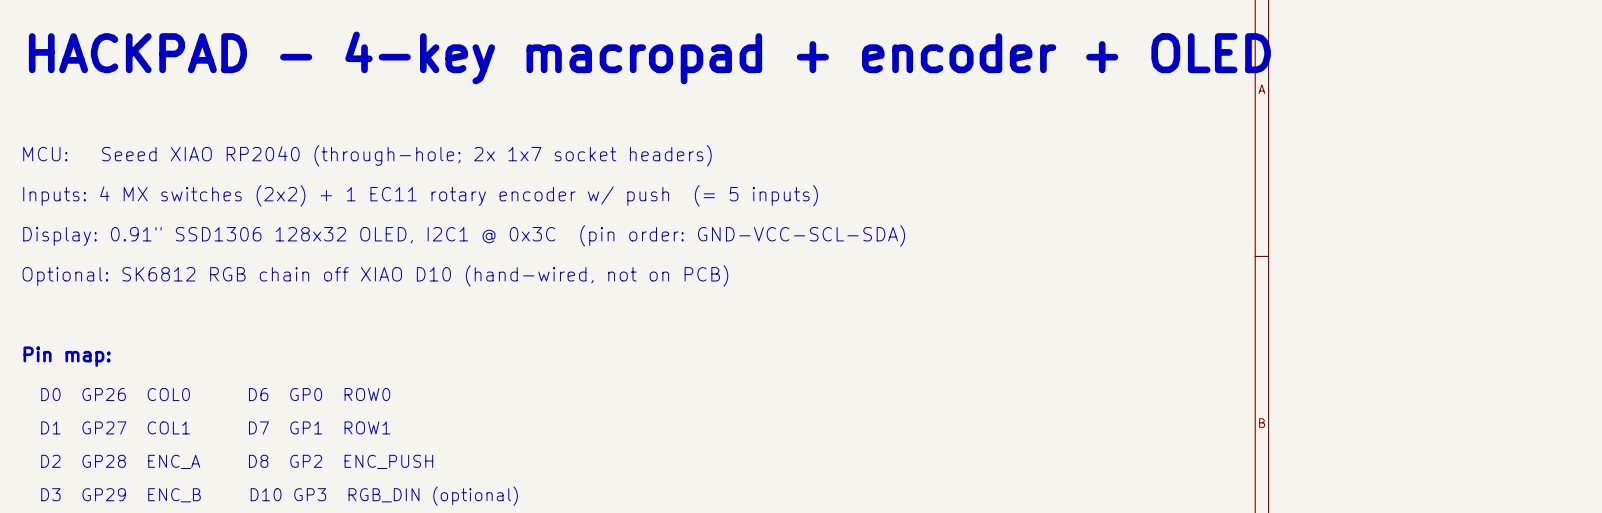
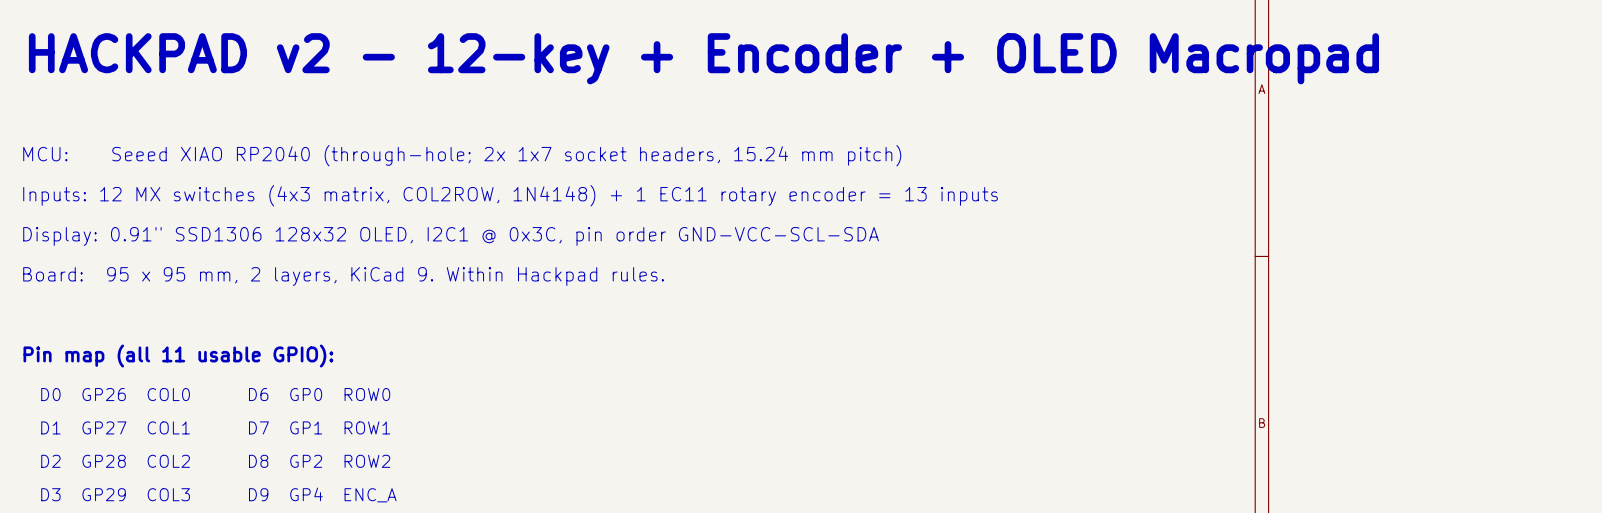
text: HACKPAD - 4-key macropad + encoder + OLED (649, 57) -> HACKPAD v2 - 12-key + Encoder + OLED Macropad (703, 58)
text: MCU: Seeed XIAO RP2040 (through-hole; 2x 1x7 socket headers) (367, 155) -> MCU: Seeed XIAO RP2040 (through-hole; 2x 1x7 socket headers, 15.24 mm pitch) (462, 155)
text: Inputs: 4 MX switches (2x2) + 1 EC11 rotary encoder w/ push (= 5 inputs) (420, 195) -> Inputs: 12 MX switches (4x3 matrix, COL2ROW, 1N4148) + 1 EC11 rotary encoder = 13 inputs (510, 195)
text: Display: 0.91" SSD1306 128x32 OLED, I2C1 @ 0x3C (pin order: GND-VCC-SCL-SDA) (464, 235) -> Display: 0.91" SSD1306 128x32 OLED, I2C1 @ 0x3C, pin order GND-VCC-SCL-SDA (451, 236)
text: Optional: SK6812 RGB chain off XIAO D10 (hand-wired, not on PCB) (375, 275) -> Board: 95 x 95 mm, 2 layers, KiCad 9. Within Hackpad rules. (343, 276)
text: Pin map: (67, 356) -> Pin map (all 11 usable GPIO): (178, 356)
text: D2 GP28 ENC_A D8 GP2 ENC_PUSH (237, 461) -> D2 GP28 COL2 D8 GP2 ROW2 (215, 461)
text: D3 GP29 ENC_B D10 GP3 RGB_DIN (optional) (279, 496) -> D3 GP29 COL3 D9 GP4 ENC_A (218, 494)

